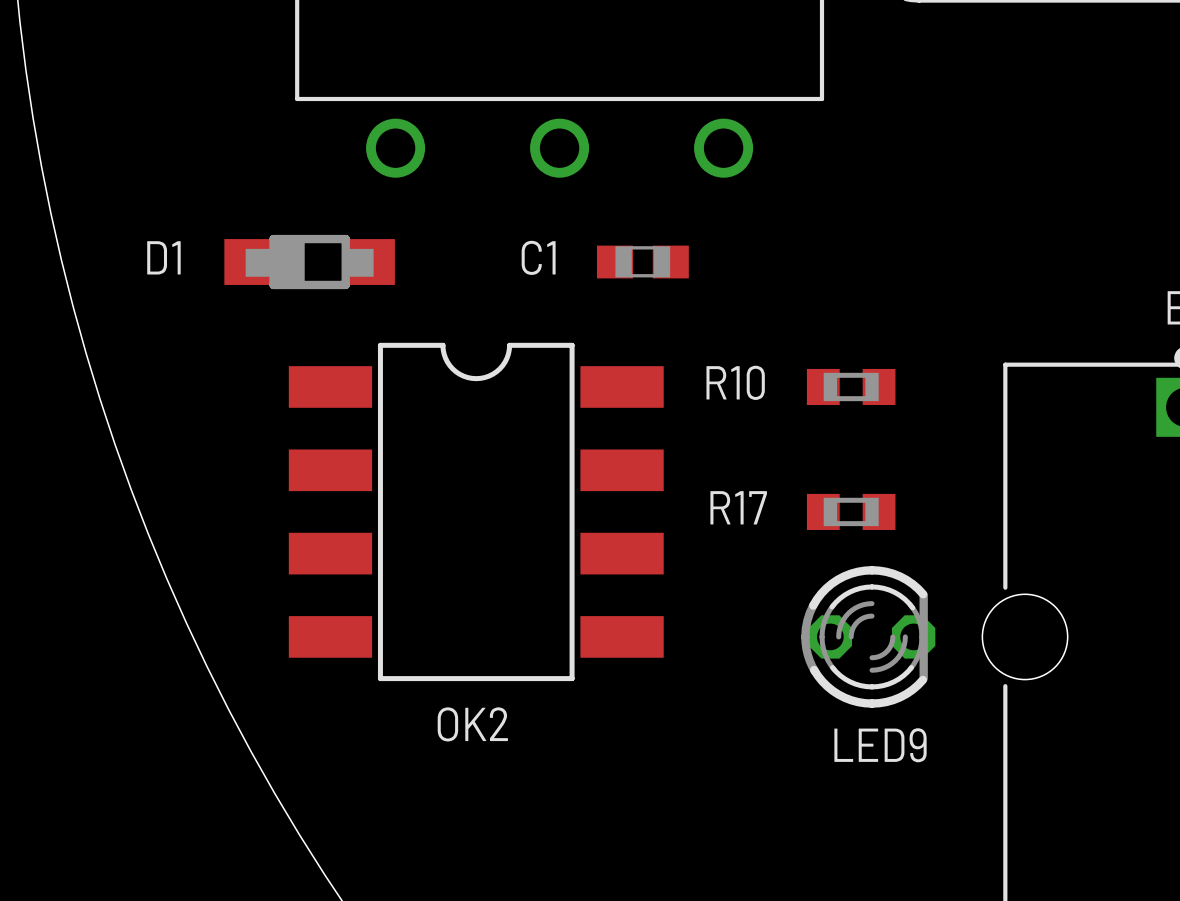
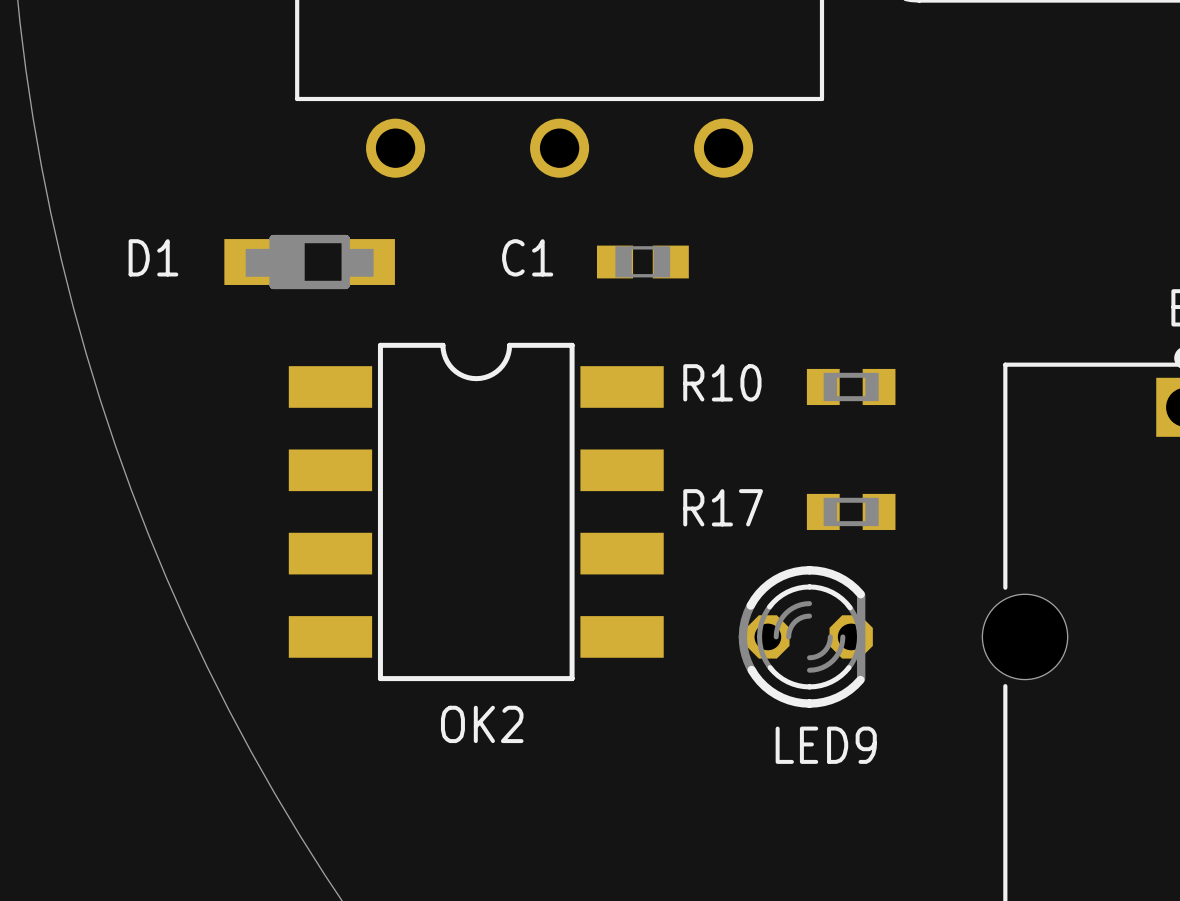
LED9 position: (868, 636) -> (805, 636)

